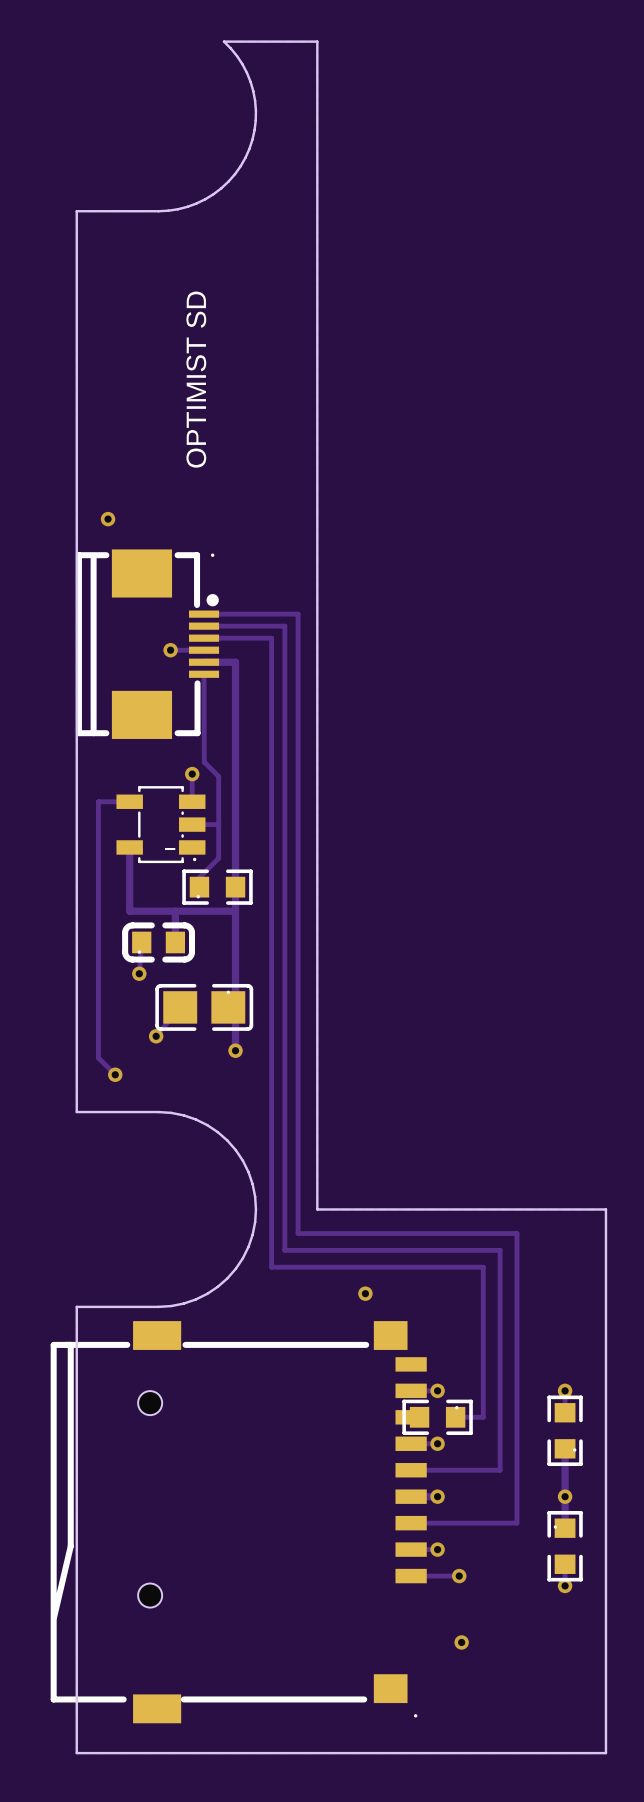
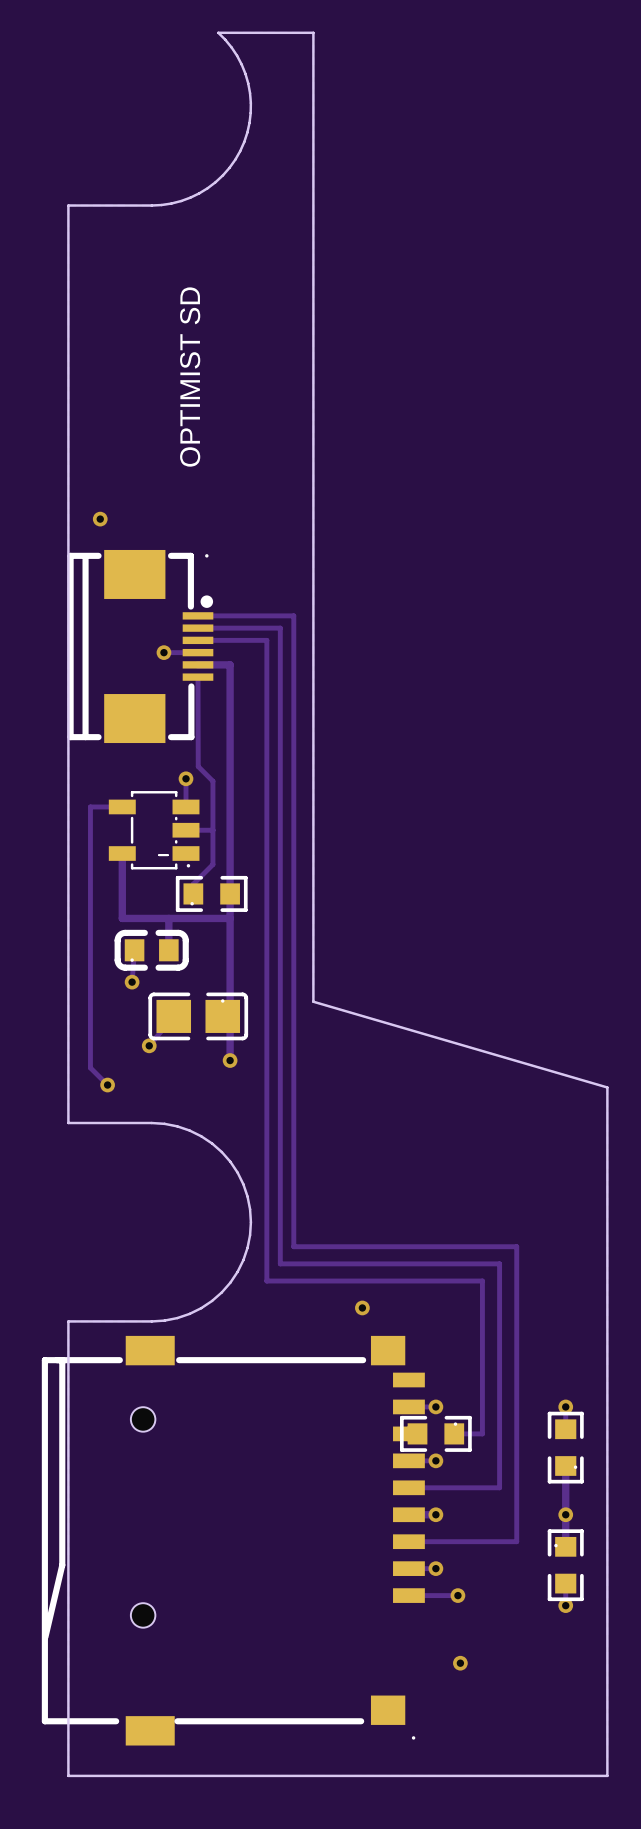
board edge: (317, 992) (317, 1209) (605, 1209) -> (313, 1001) (607, 1087) (607, 1222)

